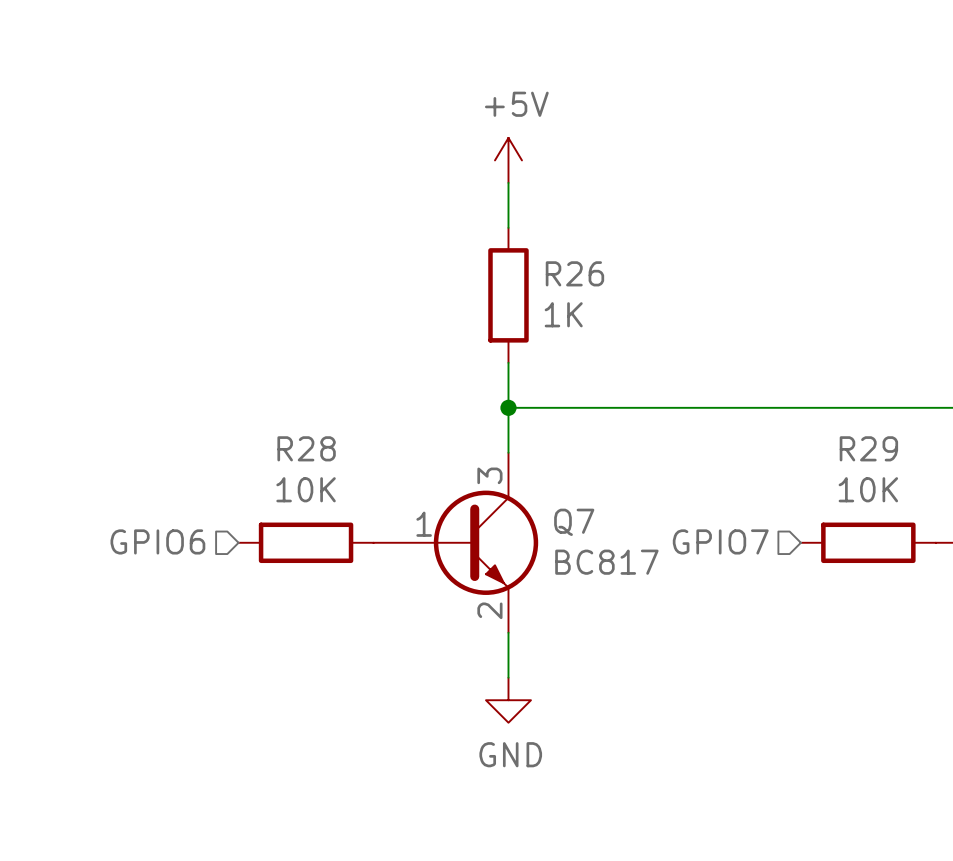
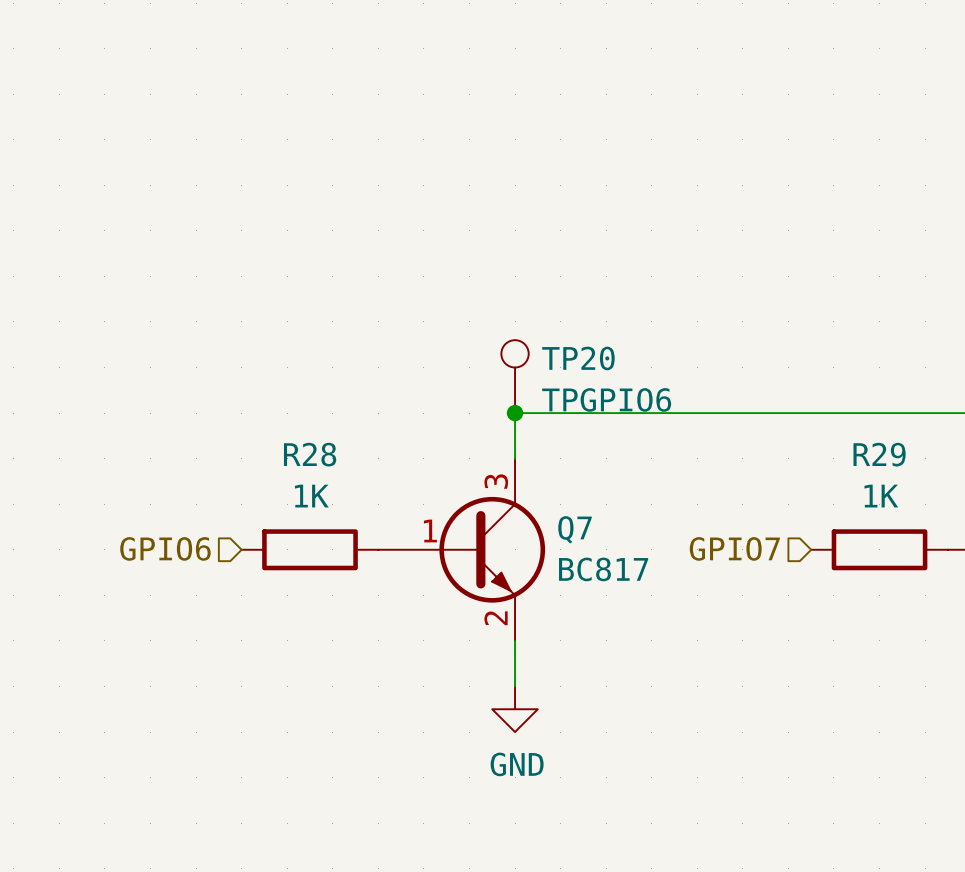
power symbol: +5V (508, 160) -> none
wire: (508, 182) (508, 227) -> none
R26: 1K (508, 295) -> none
TP20: none -> TPGPIO6 (515, 376)
R28 value: 10K (306, 489) -> 1K (311, 496)
R29 value: 10K (868, 489) -> 1K (881, 496)

